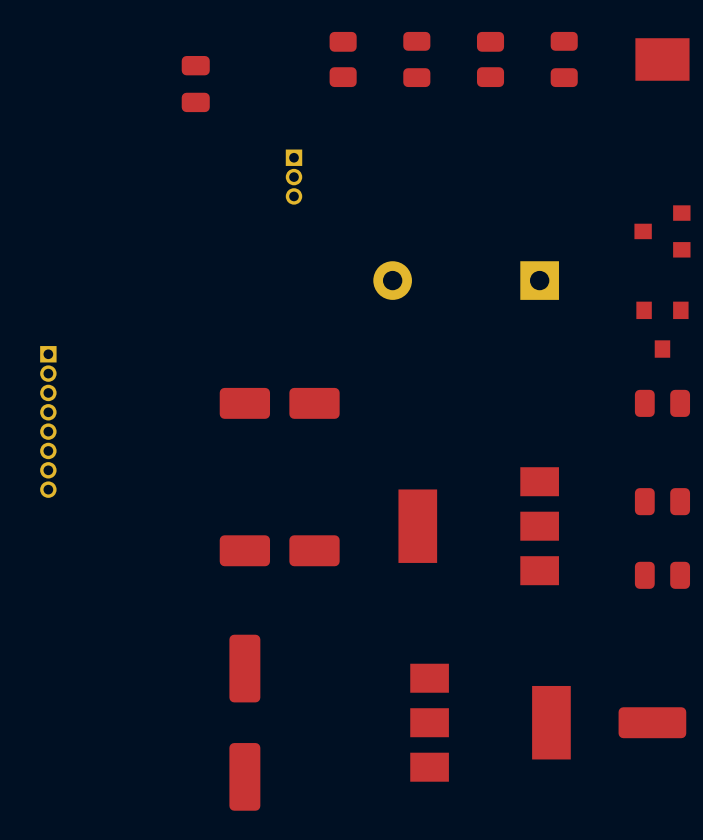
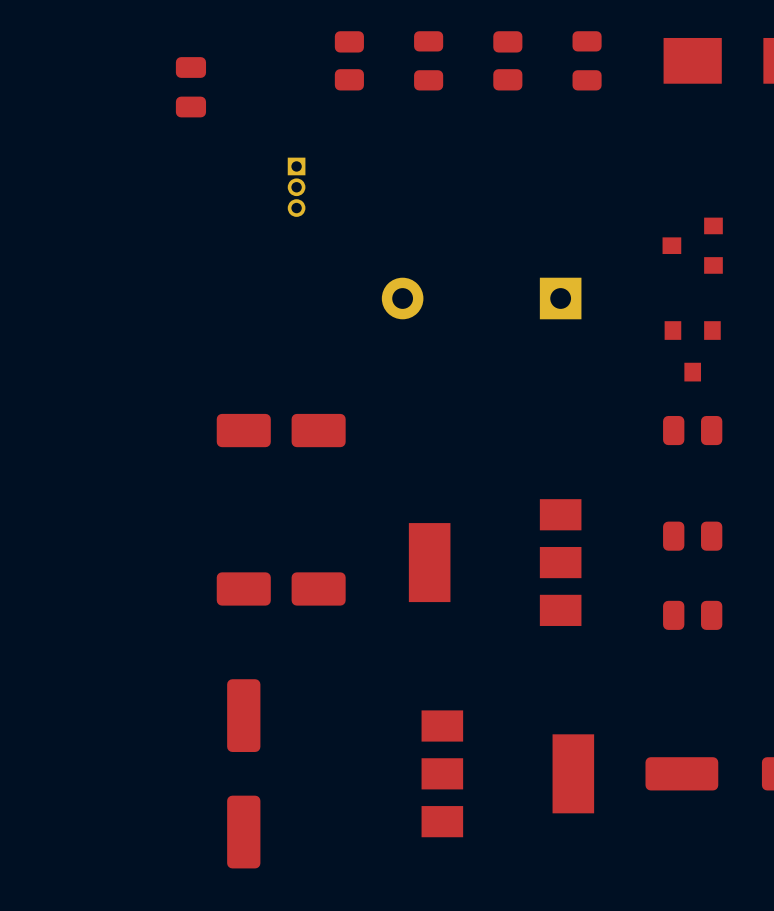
part: (48, 421) -> none

